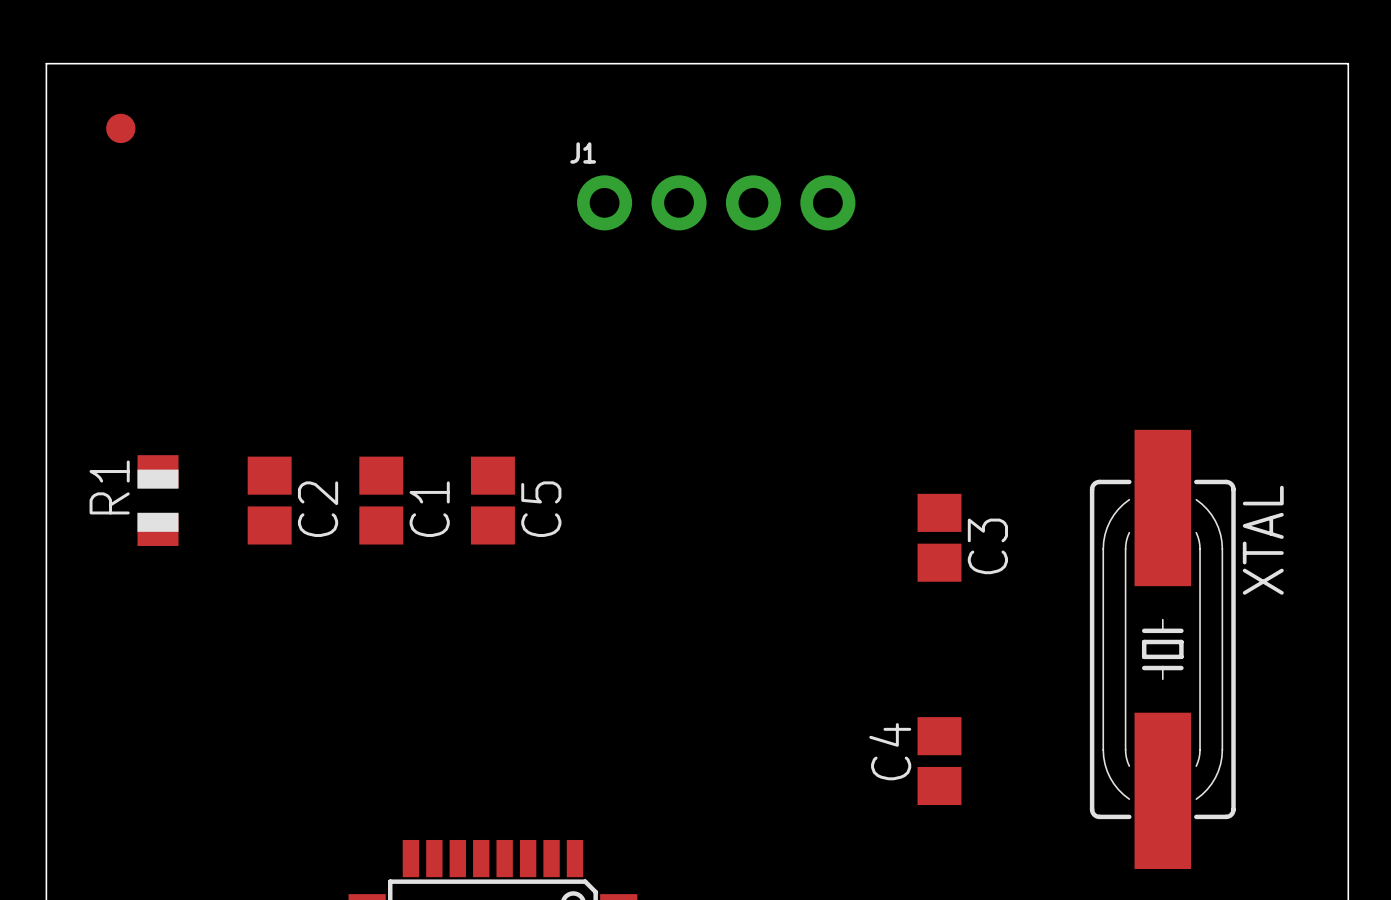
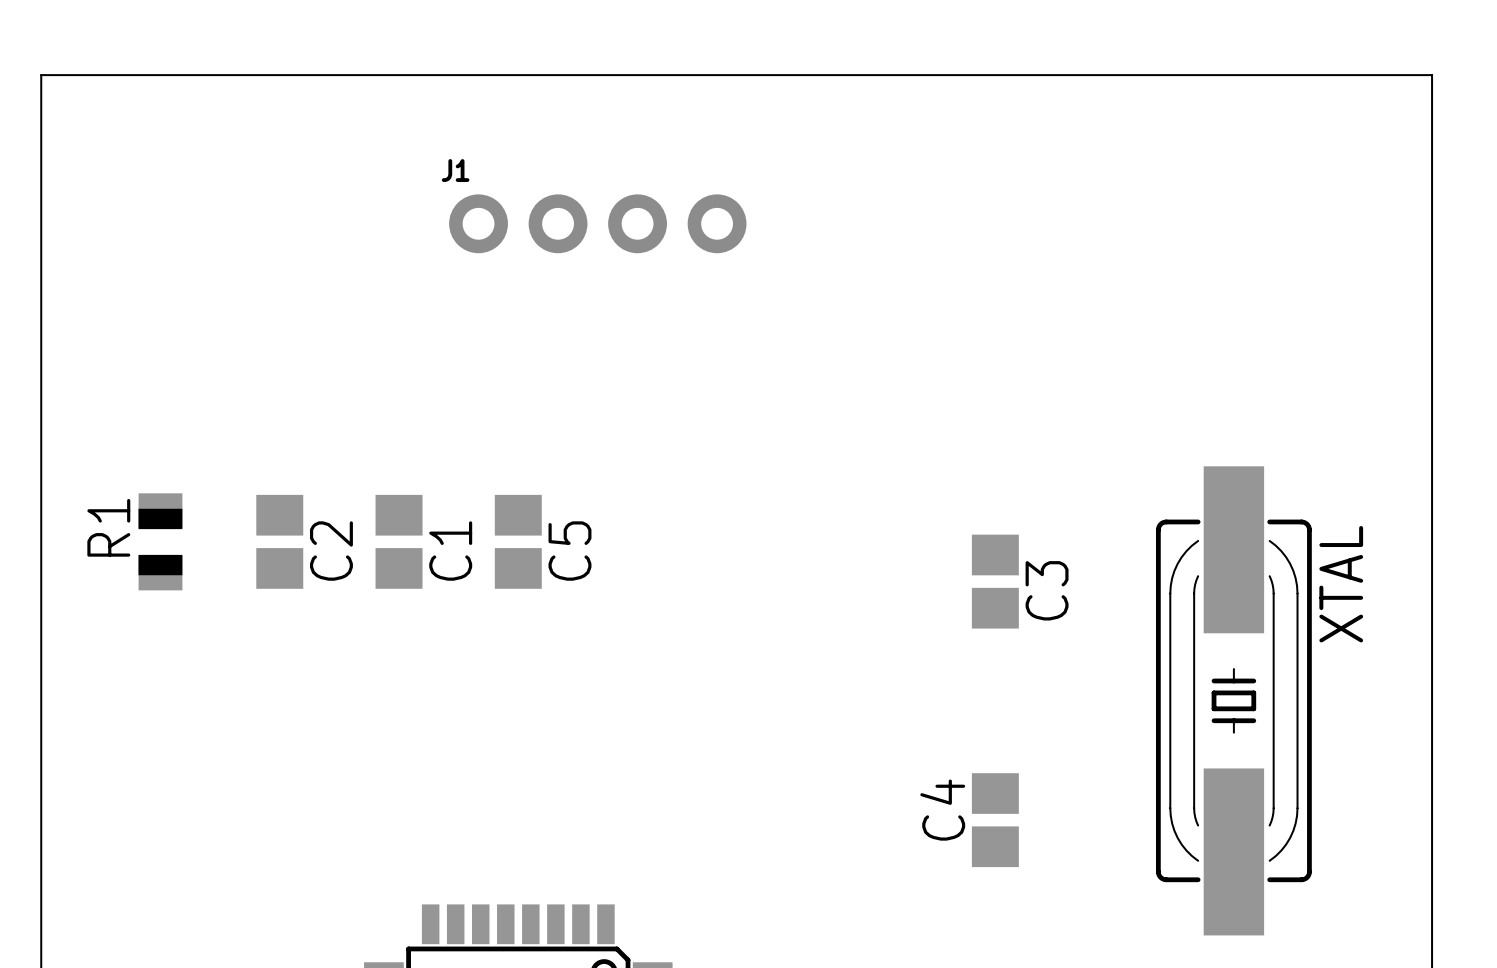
part: (120, 128) -> none
J1 position: (716, 202) -> (597, 223)

